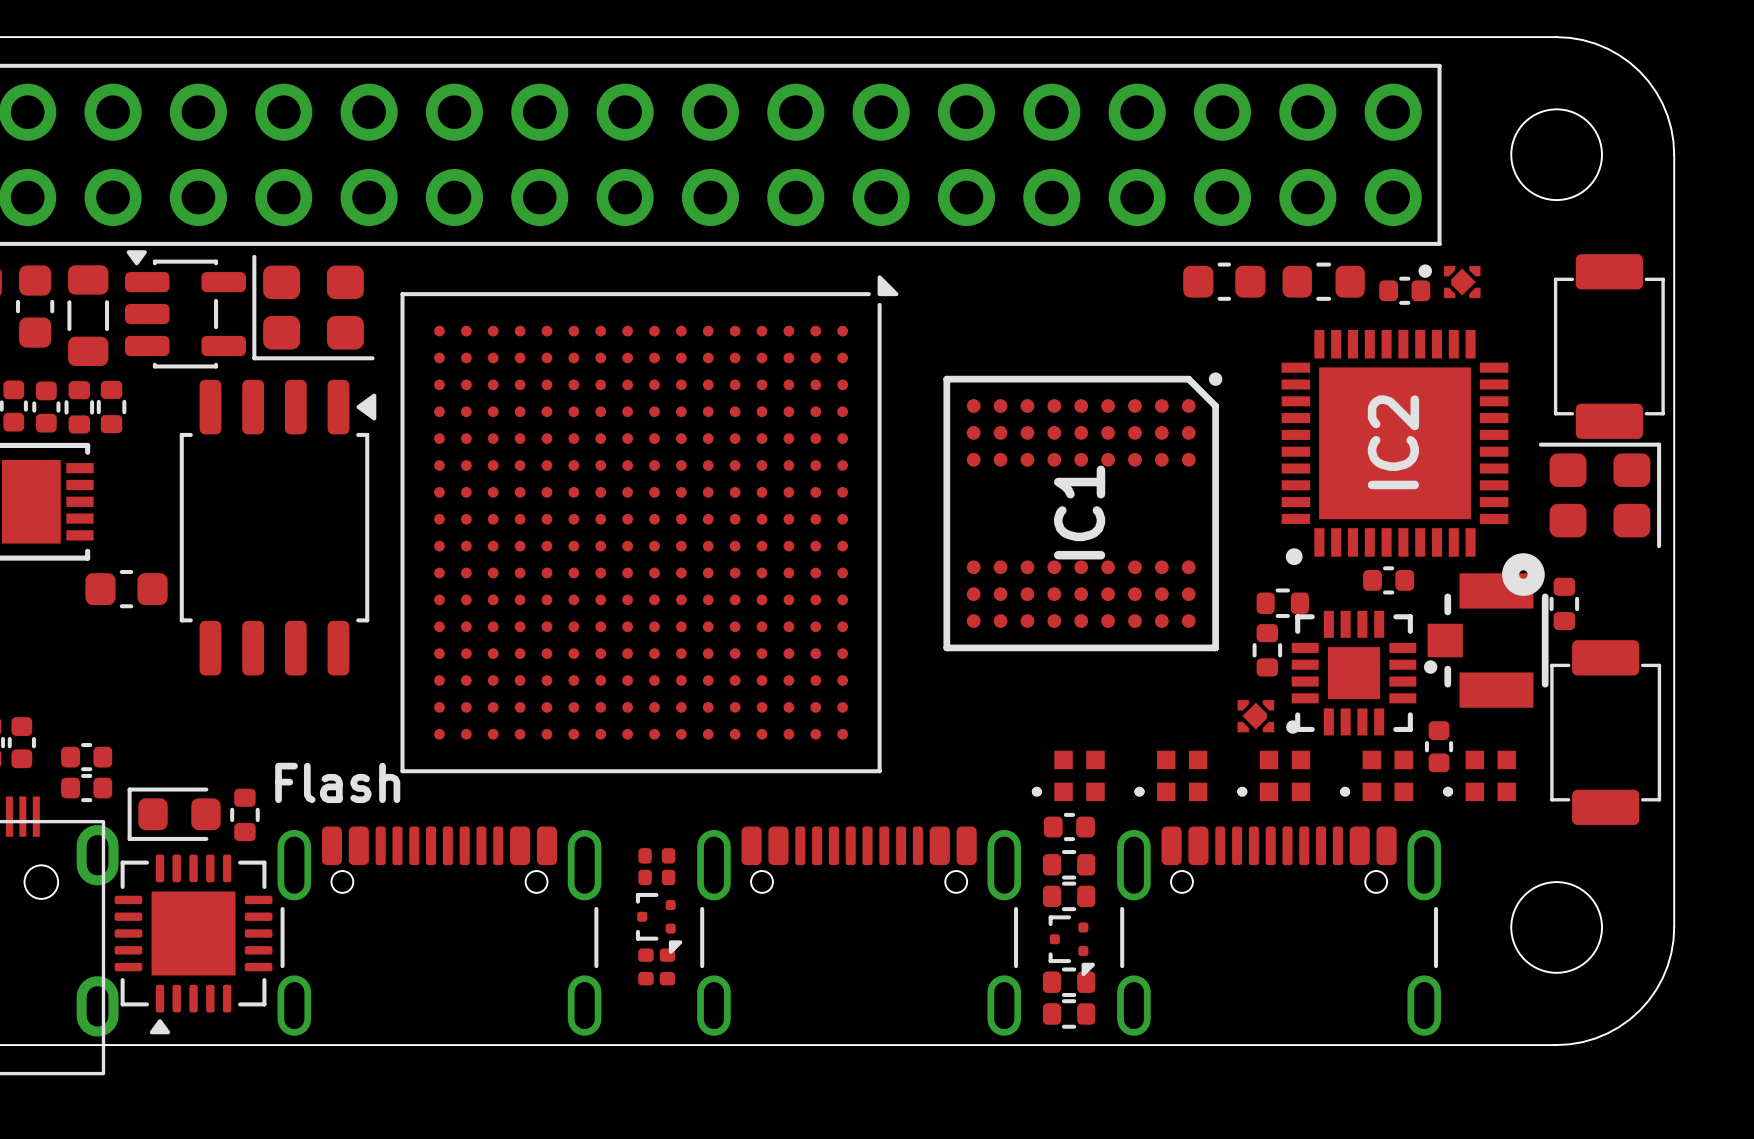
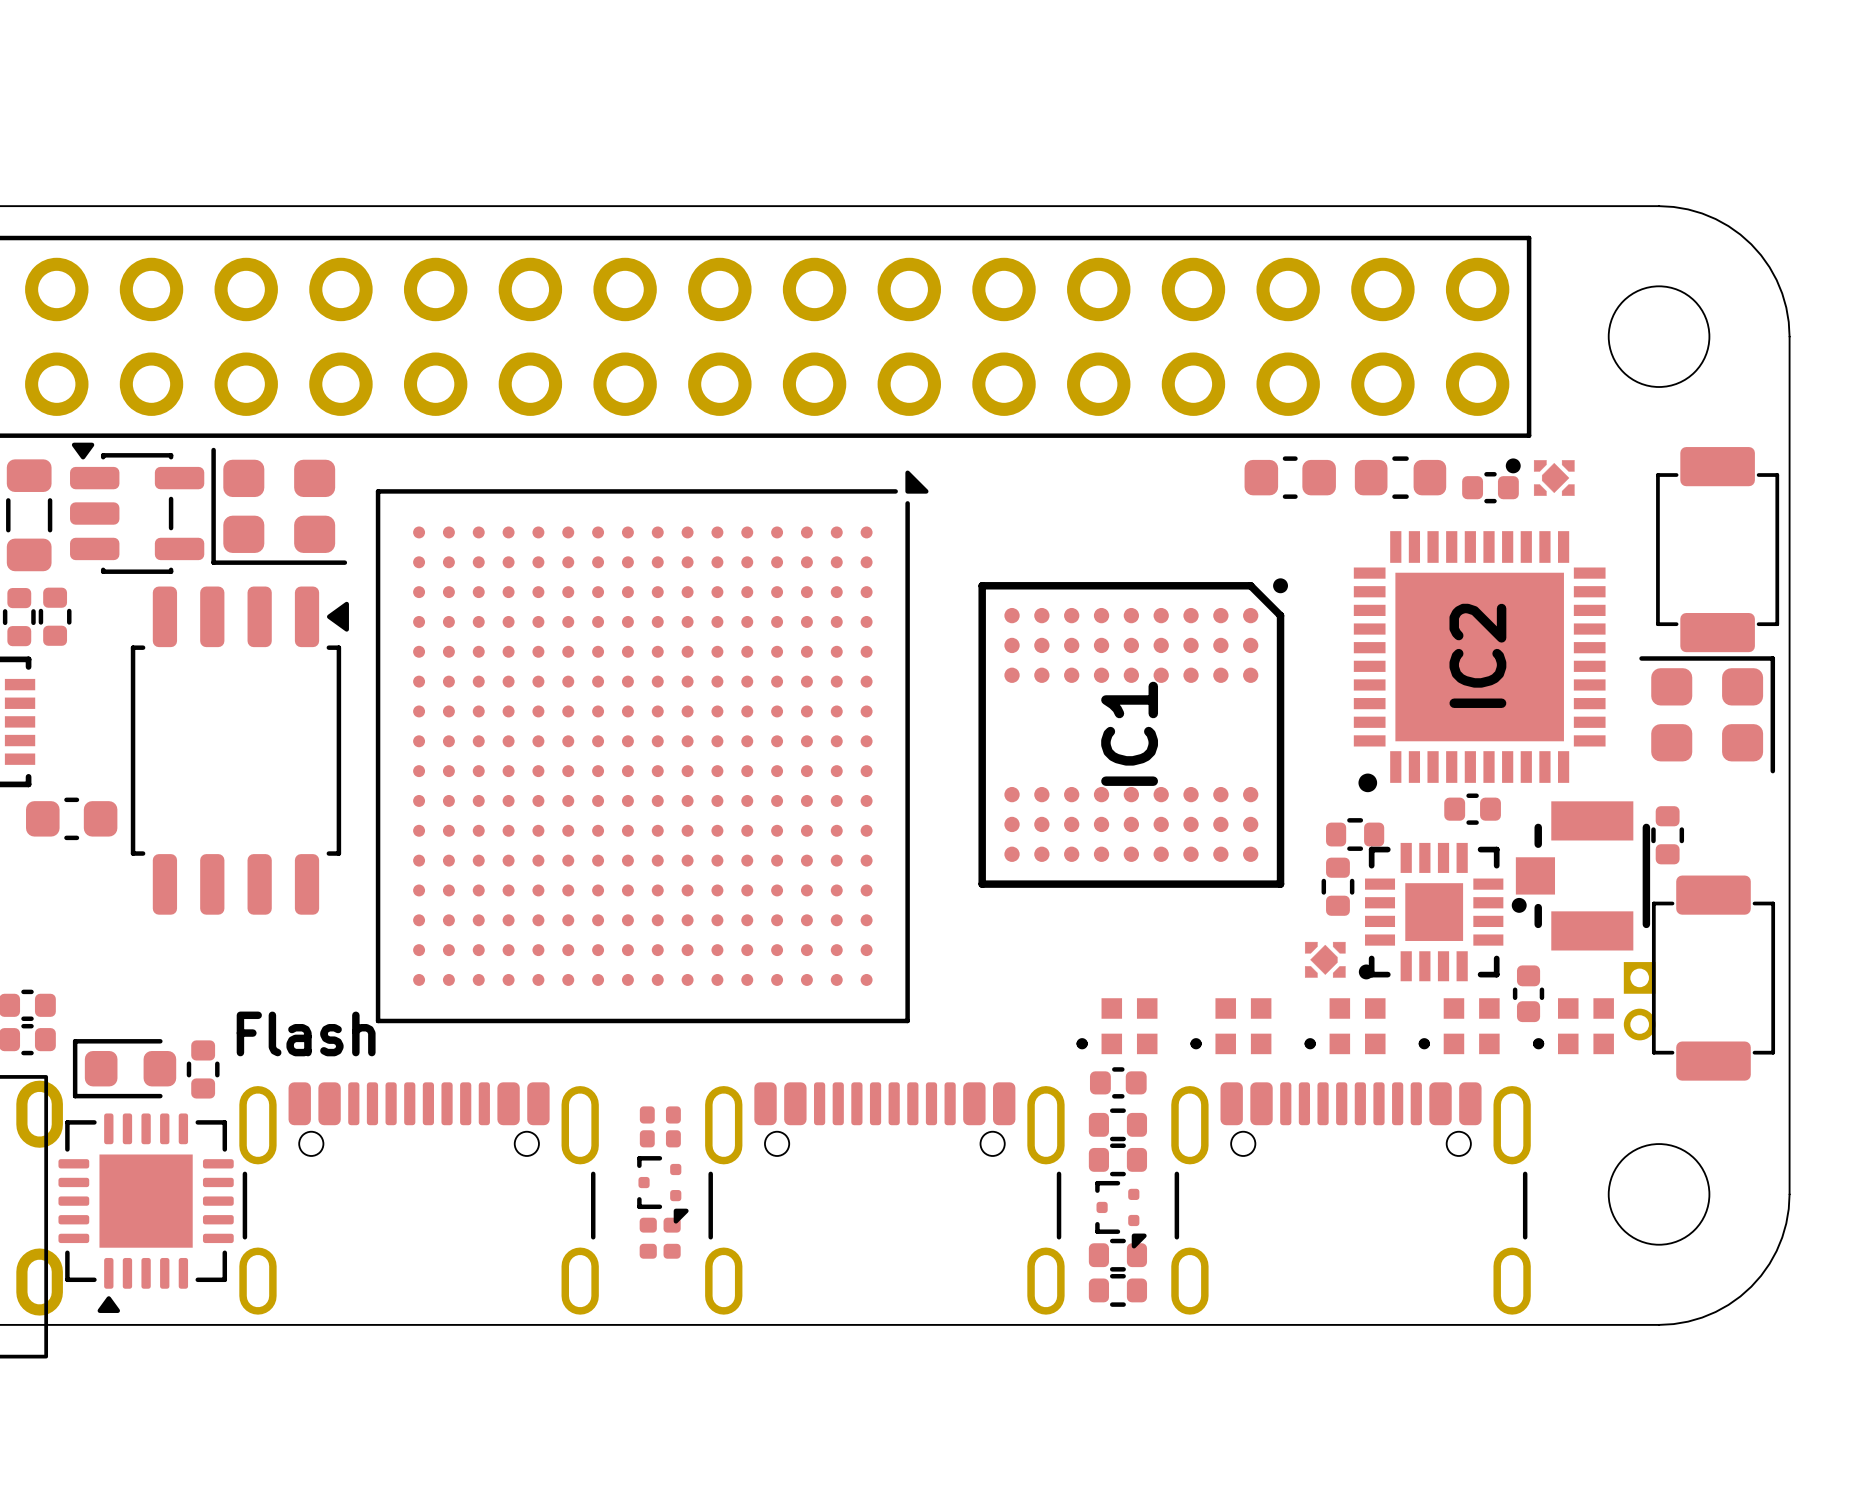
part: (1523, 574) -> none
part: none -> (1639, 1001)

